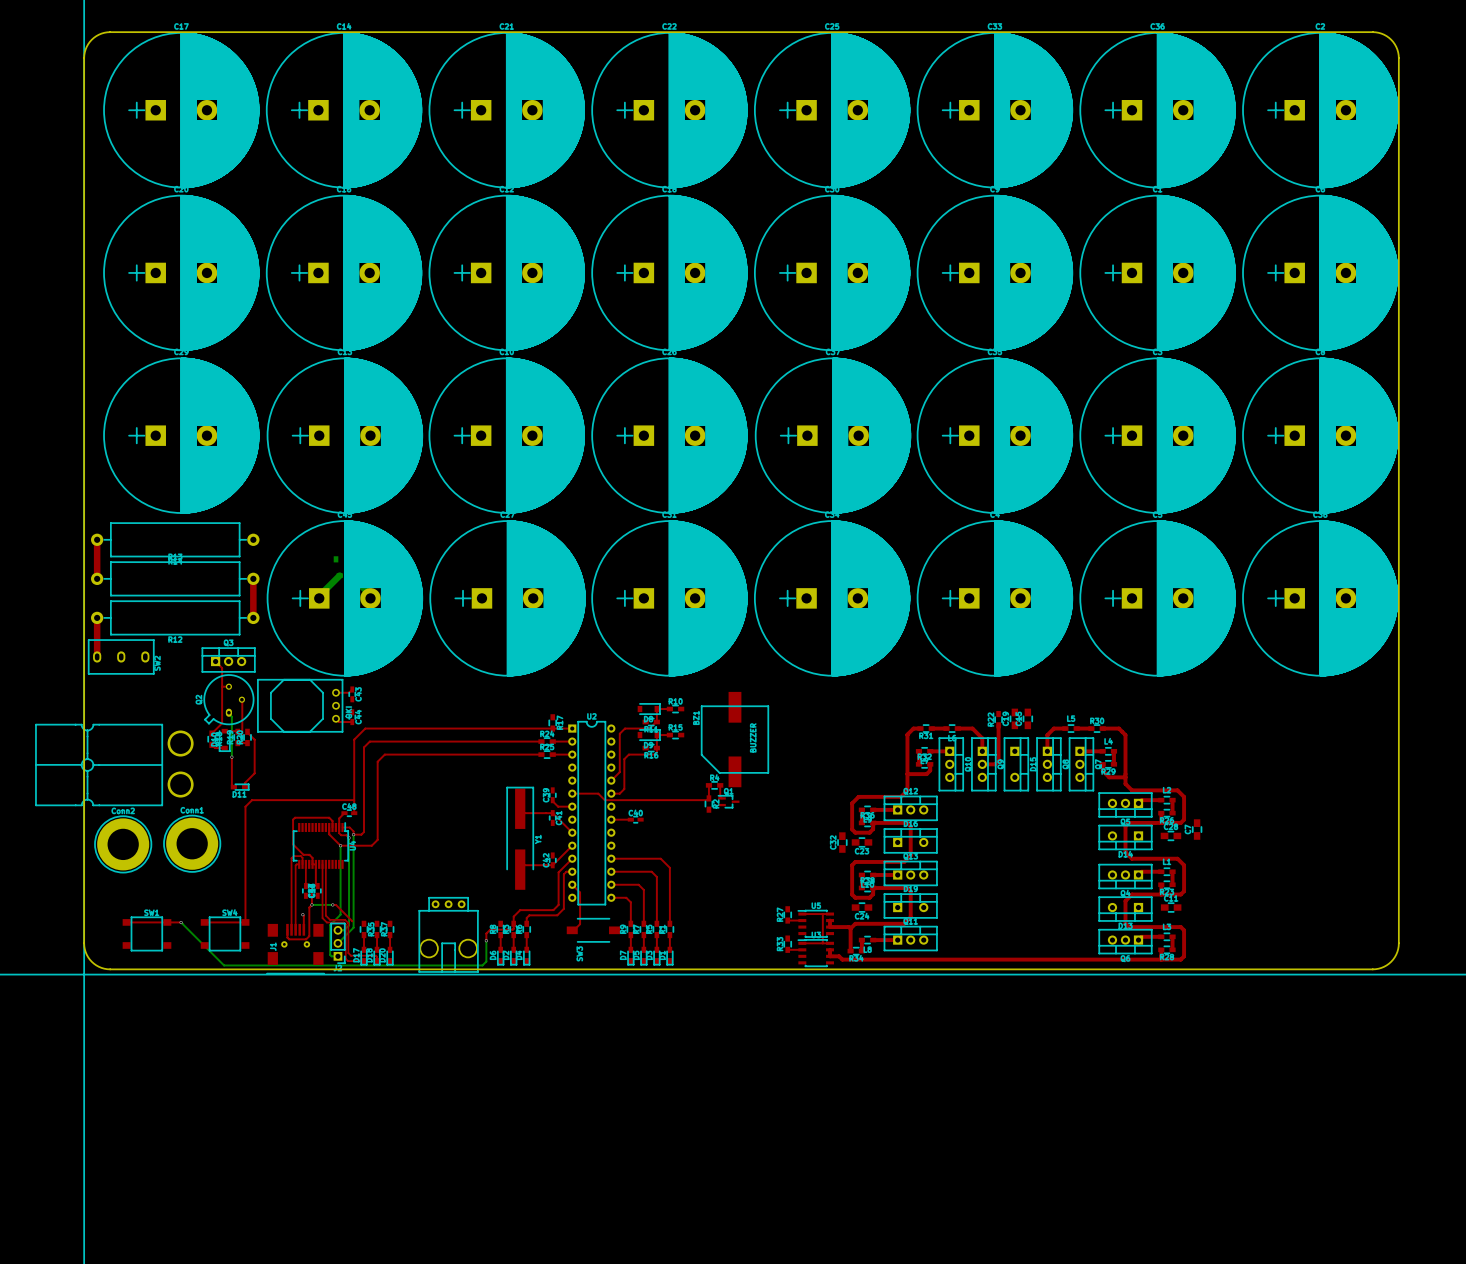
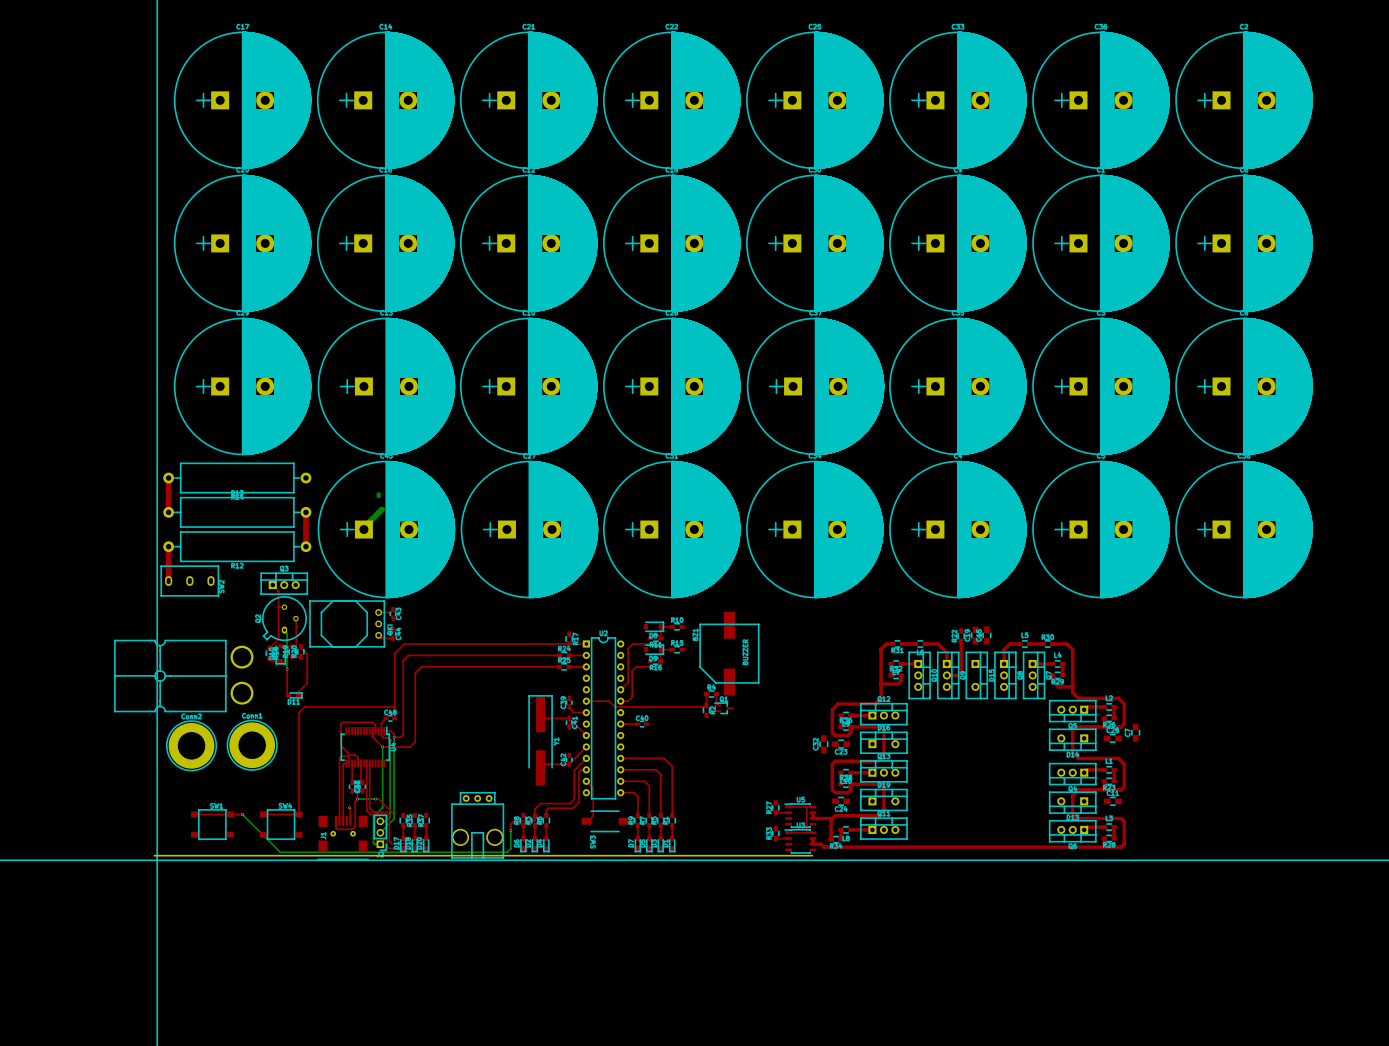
board edge: (110, 969) (98, 966) (91, 961) (85, 951) (84, 943) (84, 58) (86, 46) (93, 37) (110, 32) (1372, 32) (1386, 36) (1394, 44) (1398, 58) (1398, 943) (1394, 957) (1384, 966) (1372, 969) (829, 969) -> (180, 855) (154, 855)

